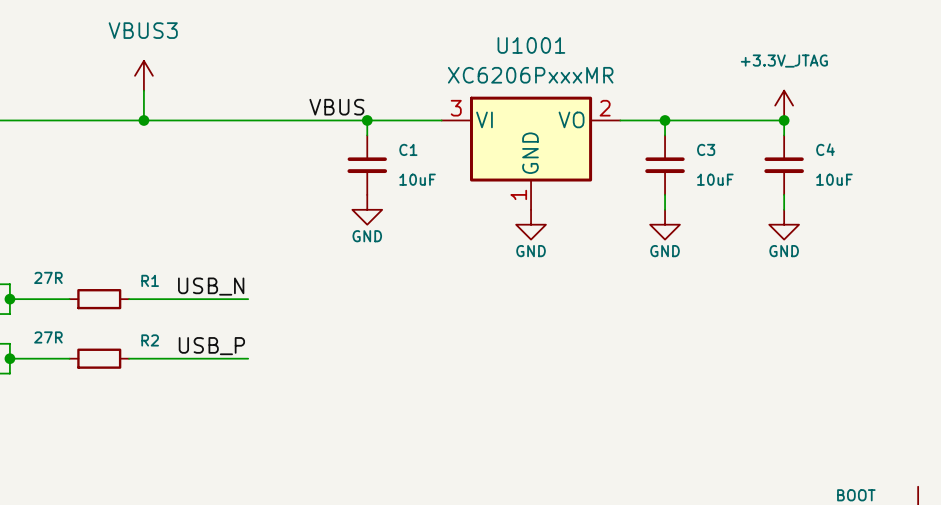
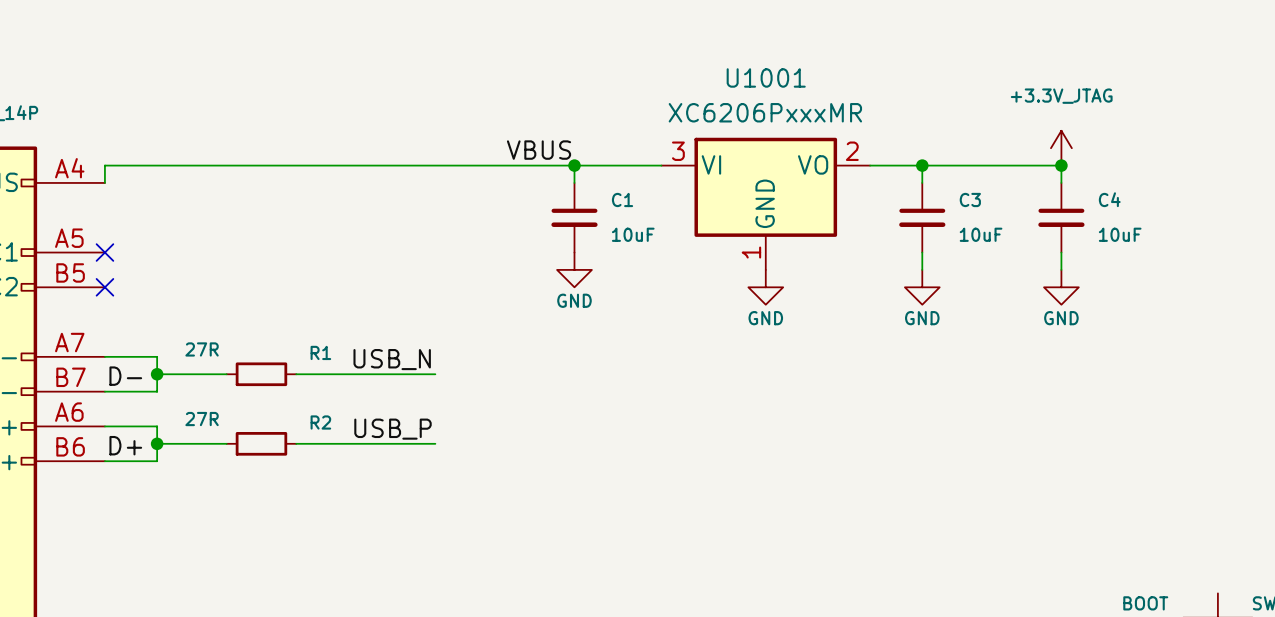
power symbol: VBUS3 (143, 75) -> none
wire: (143, 90) (143, 120) -> none
junction: (143, 120) -> none

